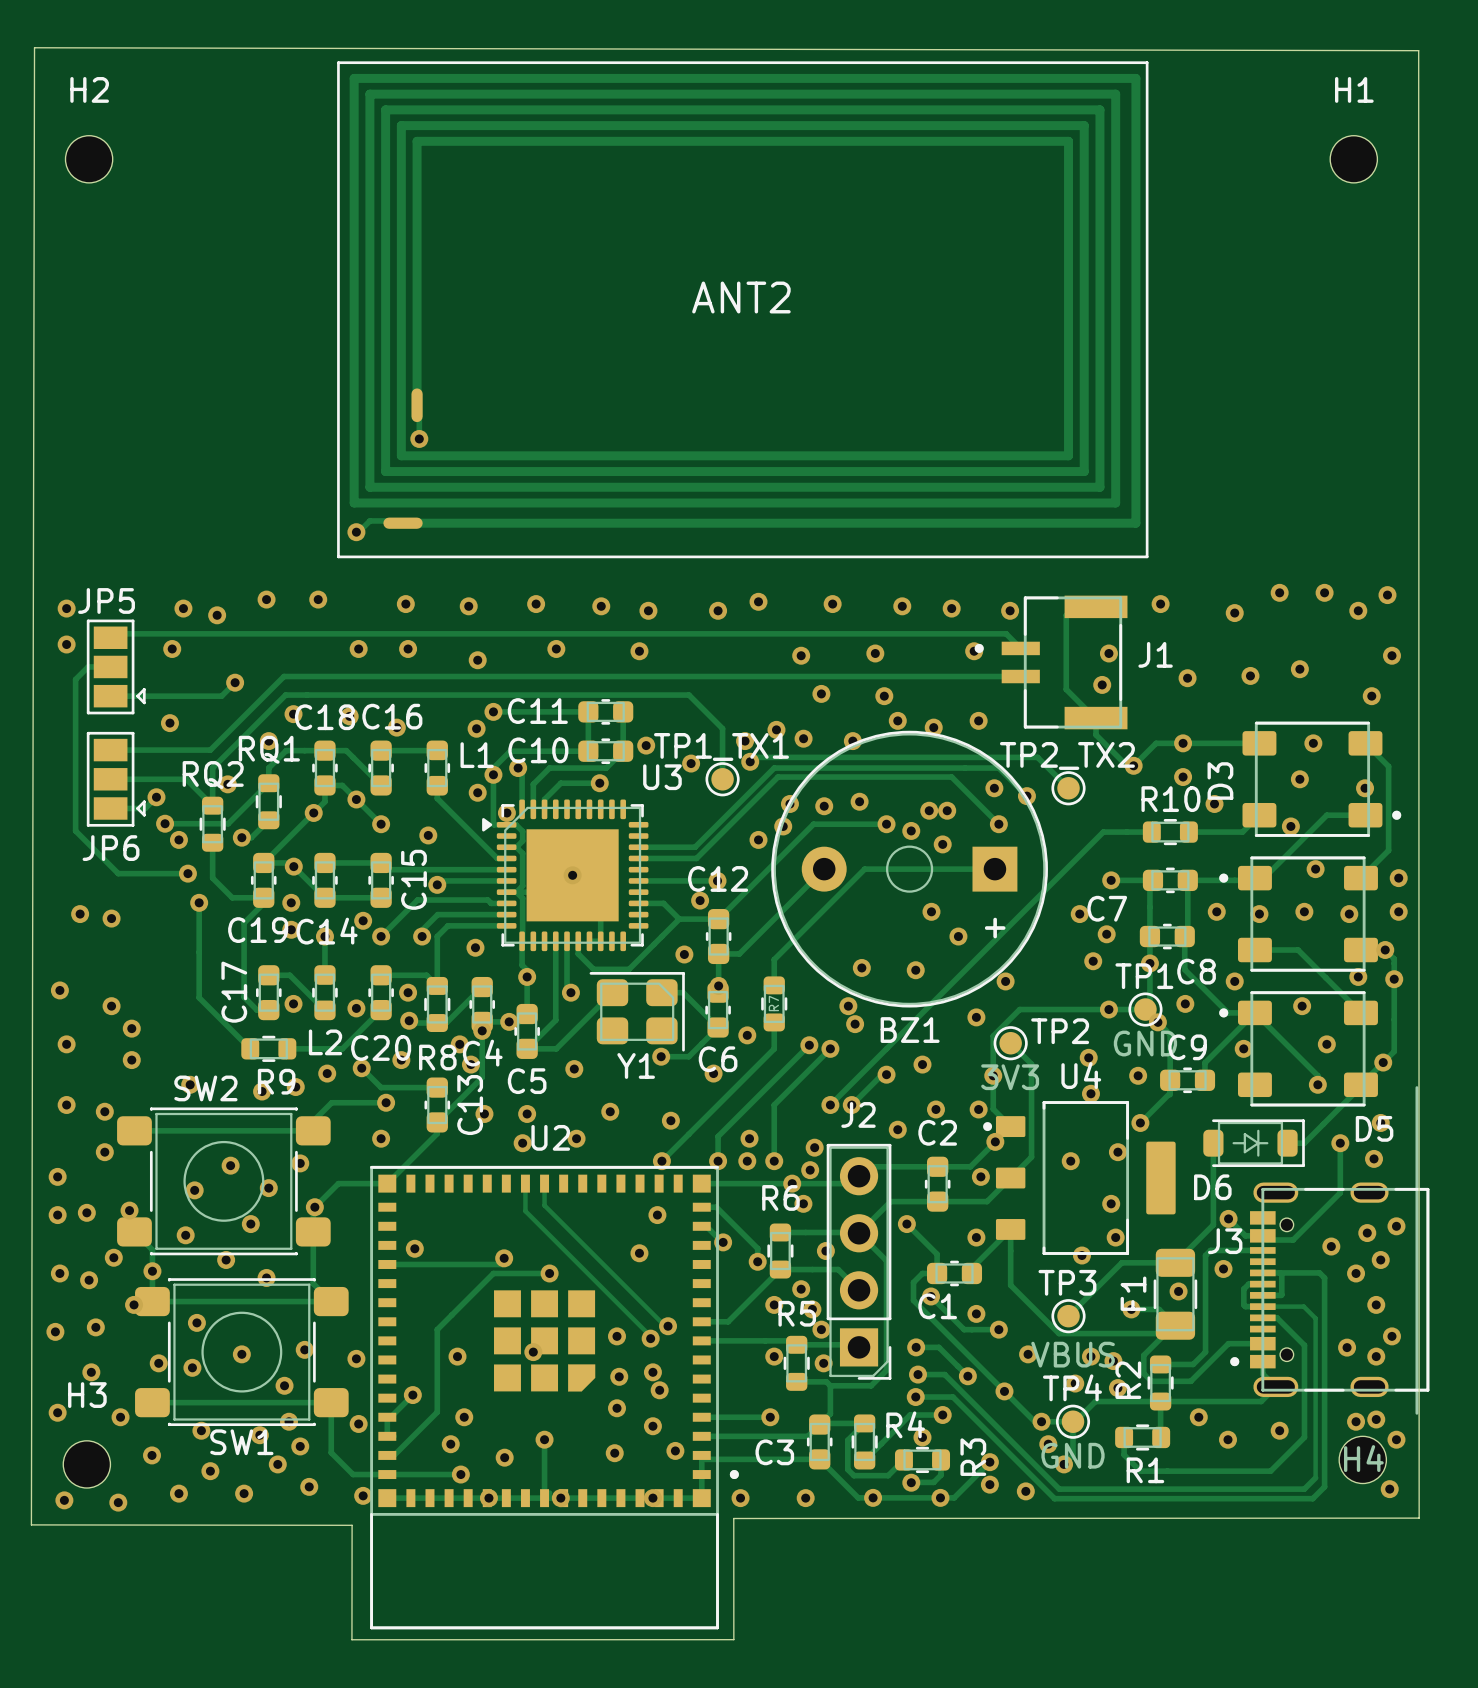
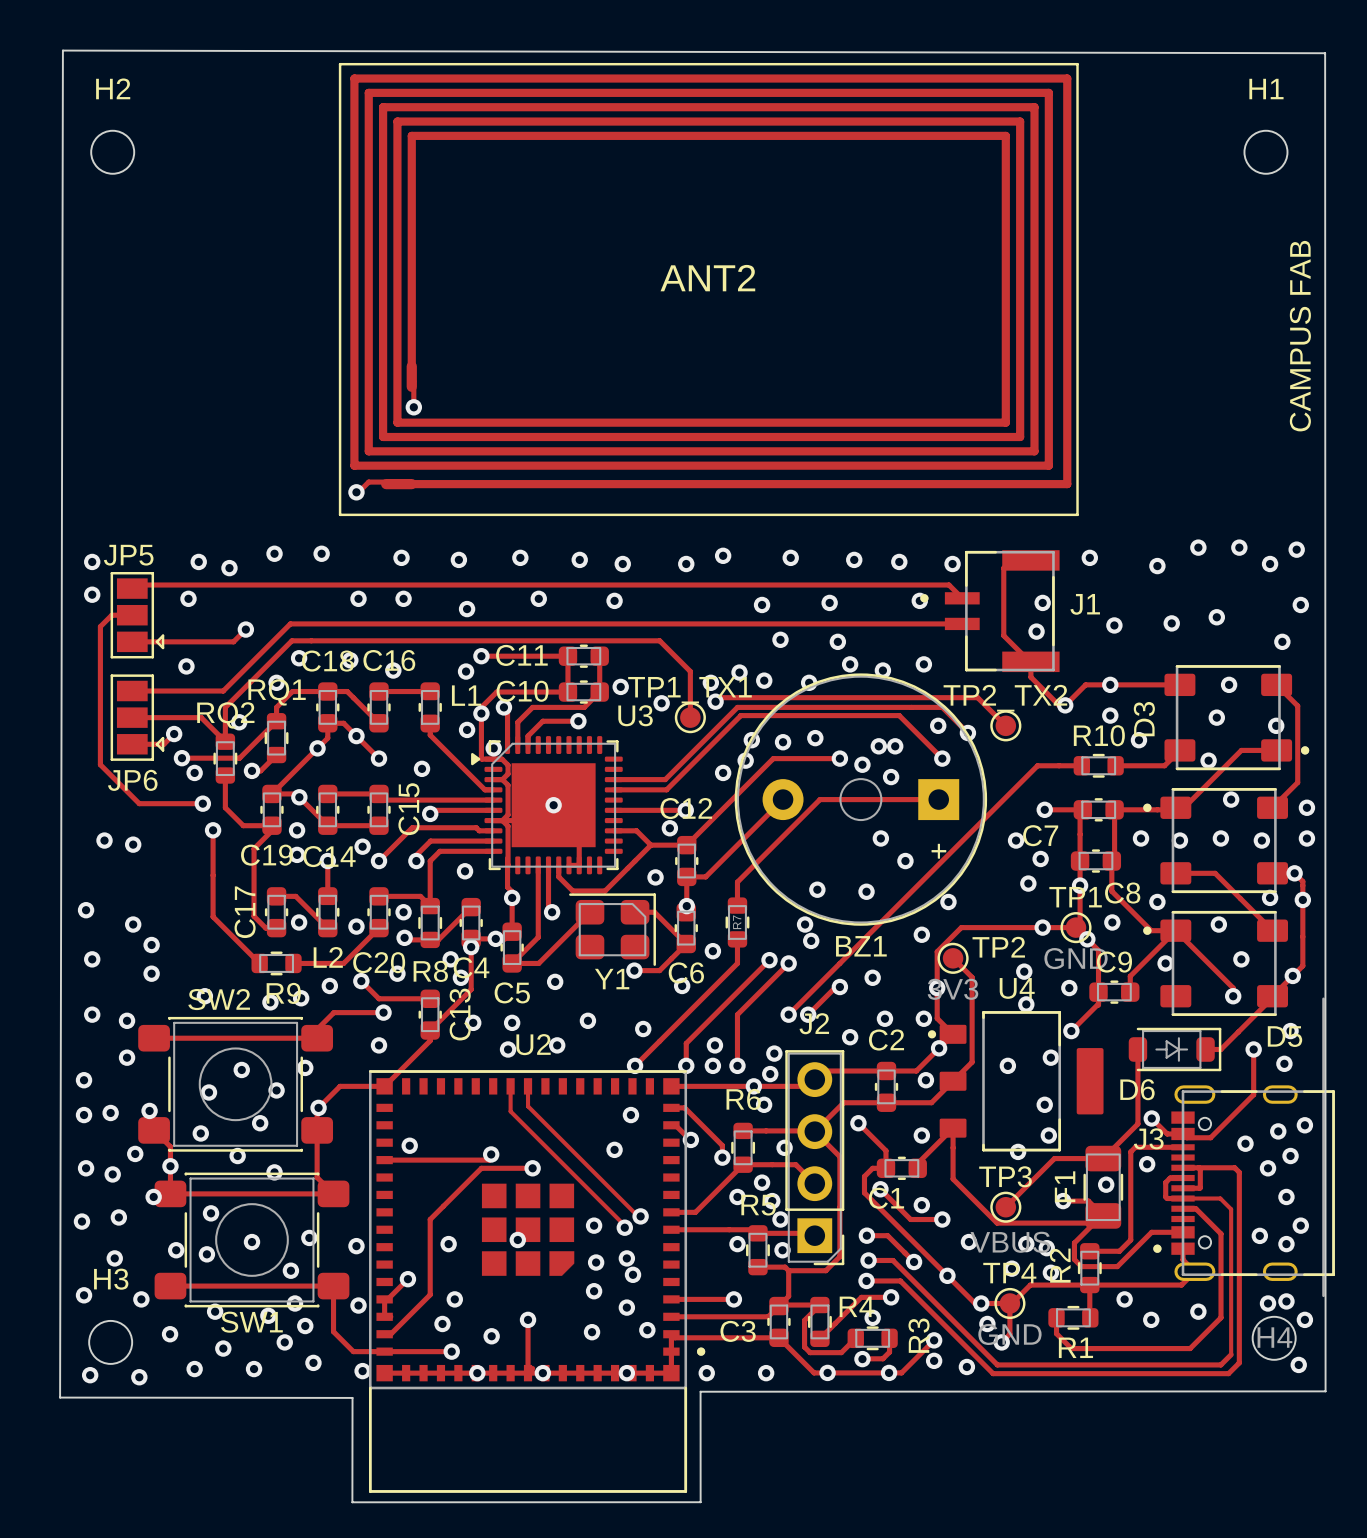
text: none -> CAMPUS FAB (1300, 336)

